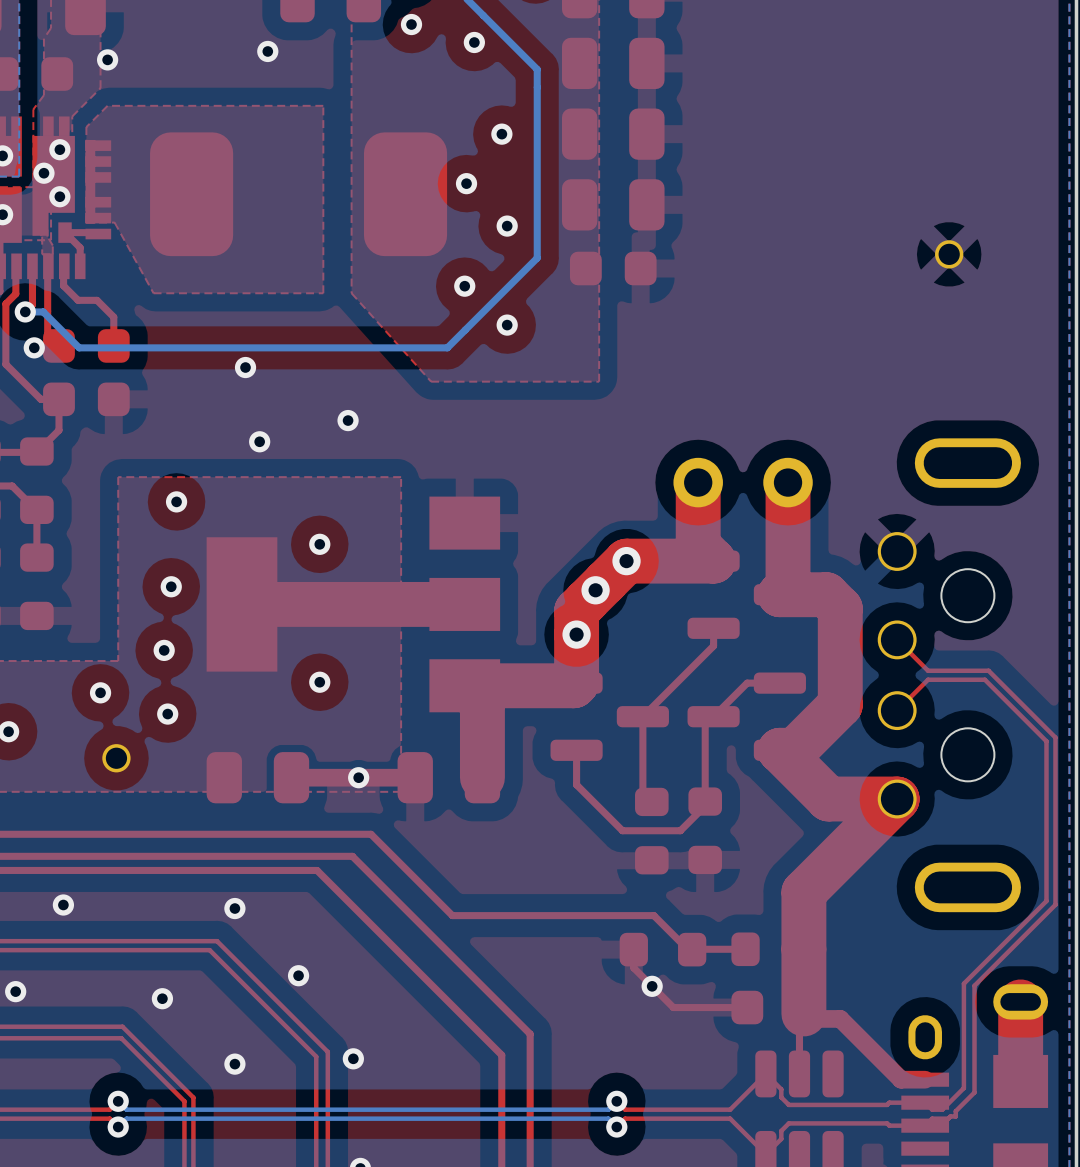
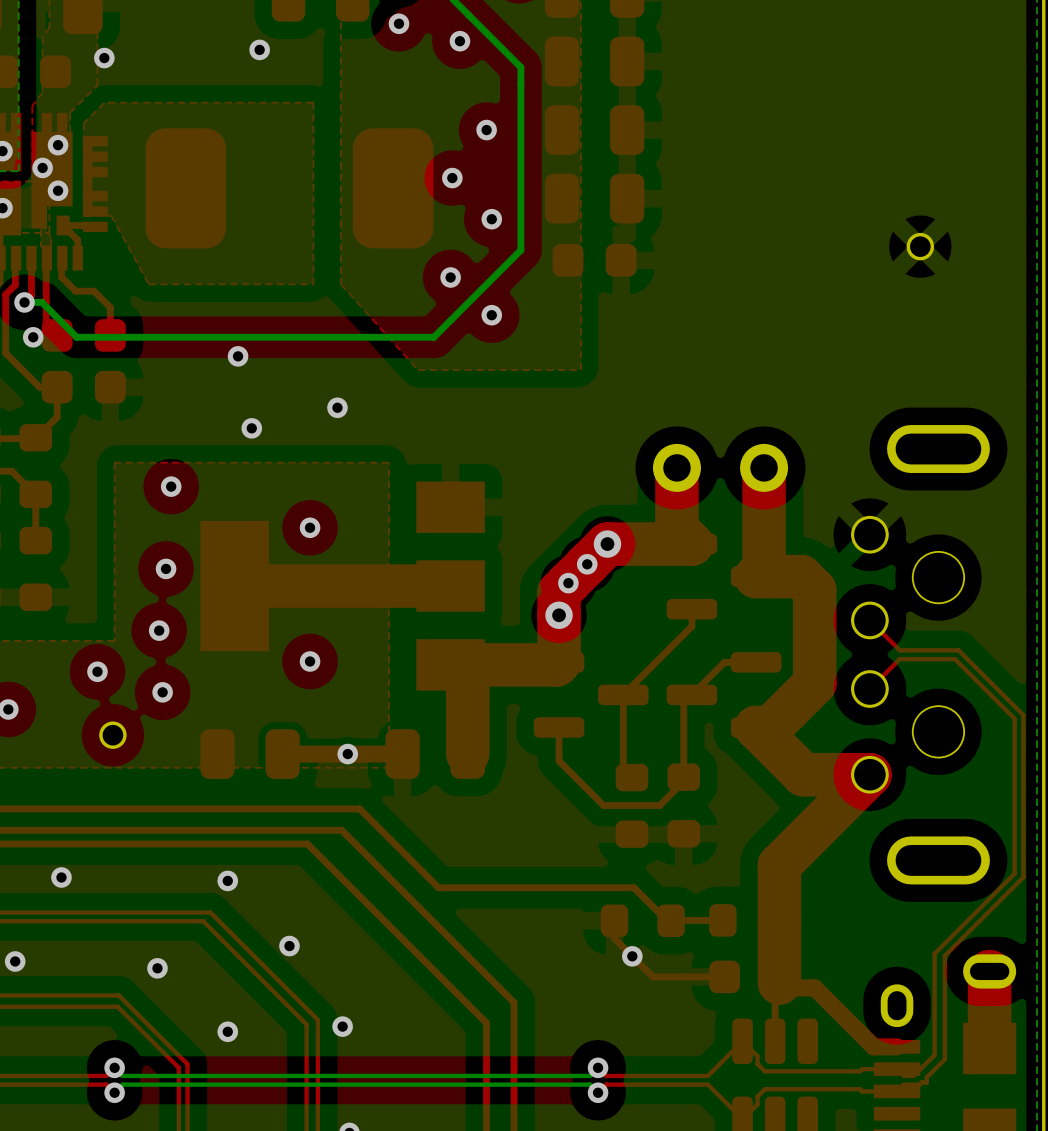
via: none -> (587, 564)
via: (595, 590) -> none
via: none -> (568, 583)

